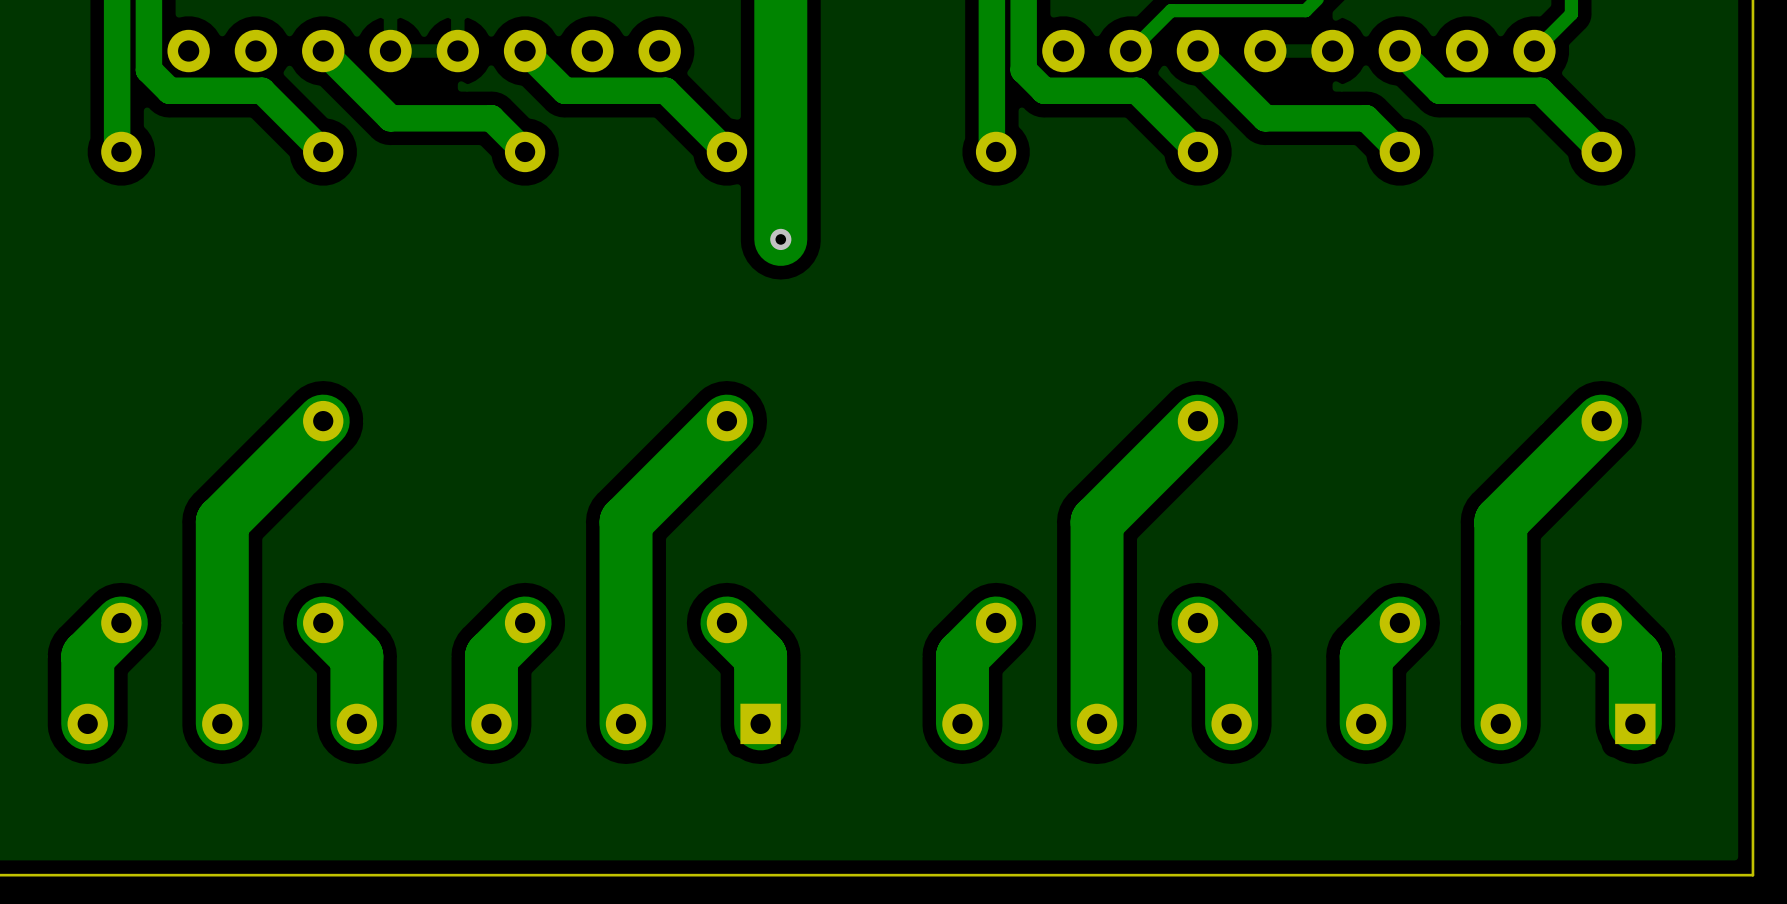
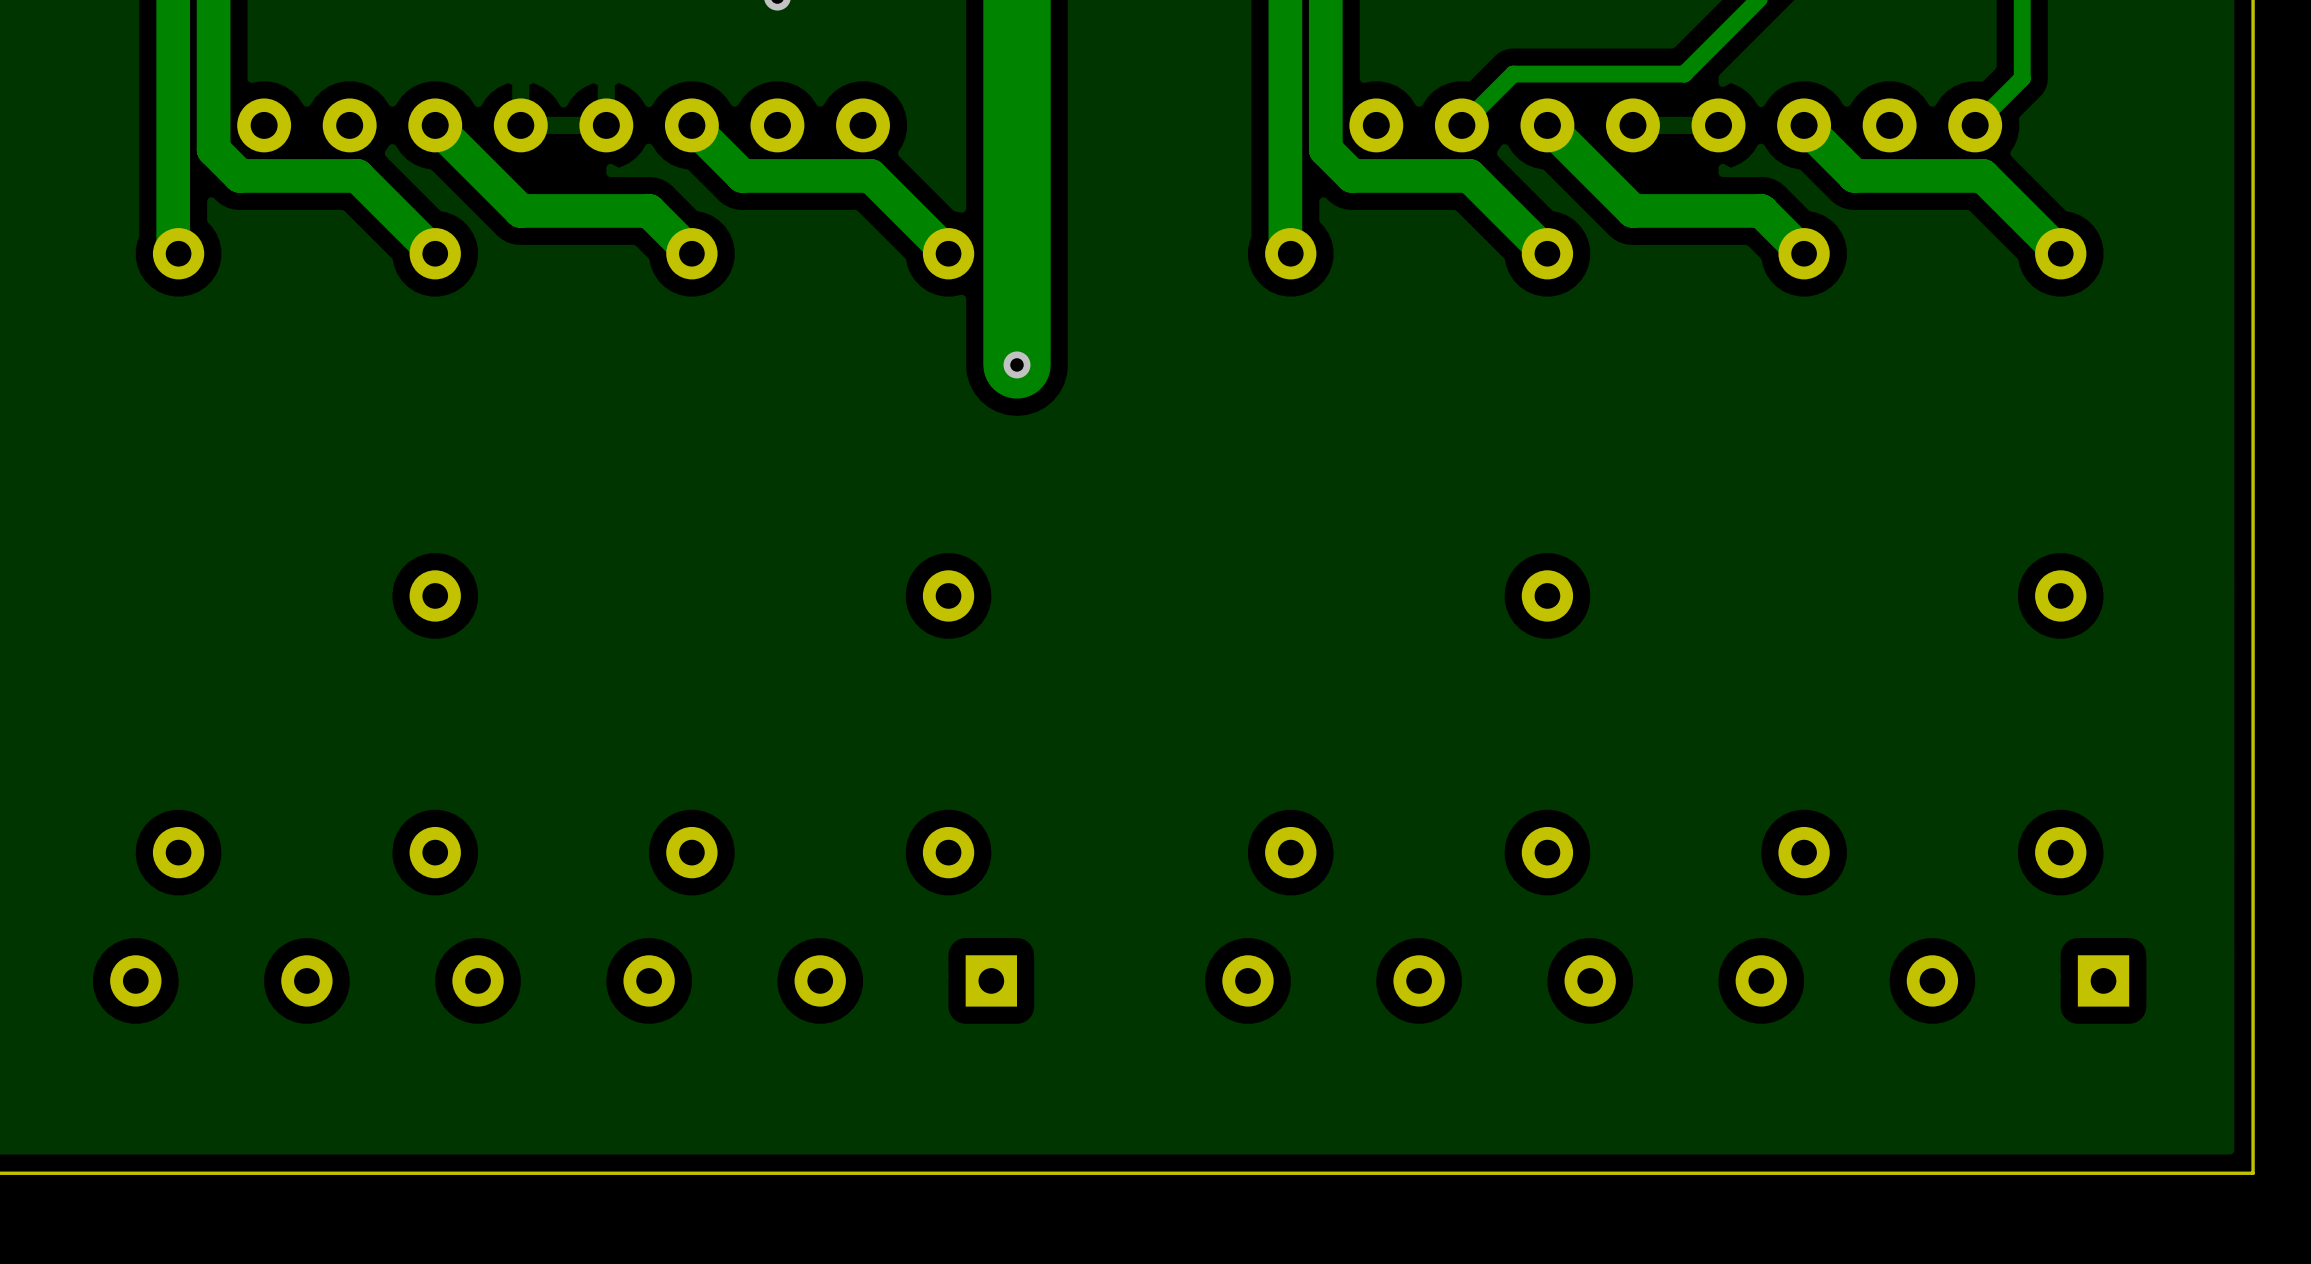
track: (323, 421) (222, 522) (222, 723) -> none
track: (726, 421) (626, 522) (626, 723) -> none
track: (1197, 421) (1097, 522) (1097, 723) -> none
track: (1601, 421) (1500, 522) (1500, 723) -> none
track: (121, 622) (87, 656) (87, 723) -> none
track: (323, 622) (356, 656) (356, 723) -> none
track: (525, 622) (491, 656) (491, 723) -> none
track: (726, 622) (760, 656) (760, 723) -> none
track: (996, 622) (962, 656) (962, 723) -> none
track: (1197, 622) (1231, 656) (1231, 723) -> none
track: (1399, 622) (1366, 656) (1366, 723) -> none
track: (1601, 622) (1635, 656) (1635, 723) -> none

